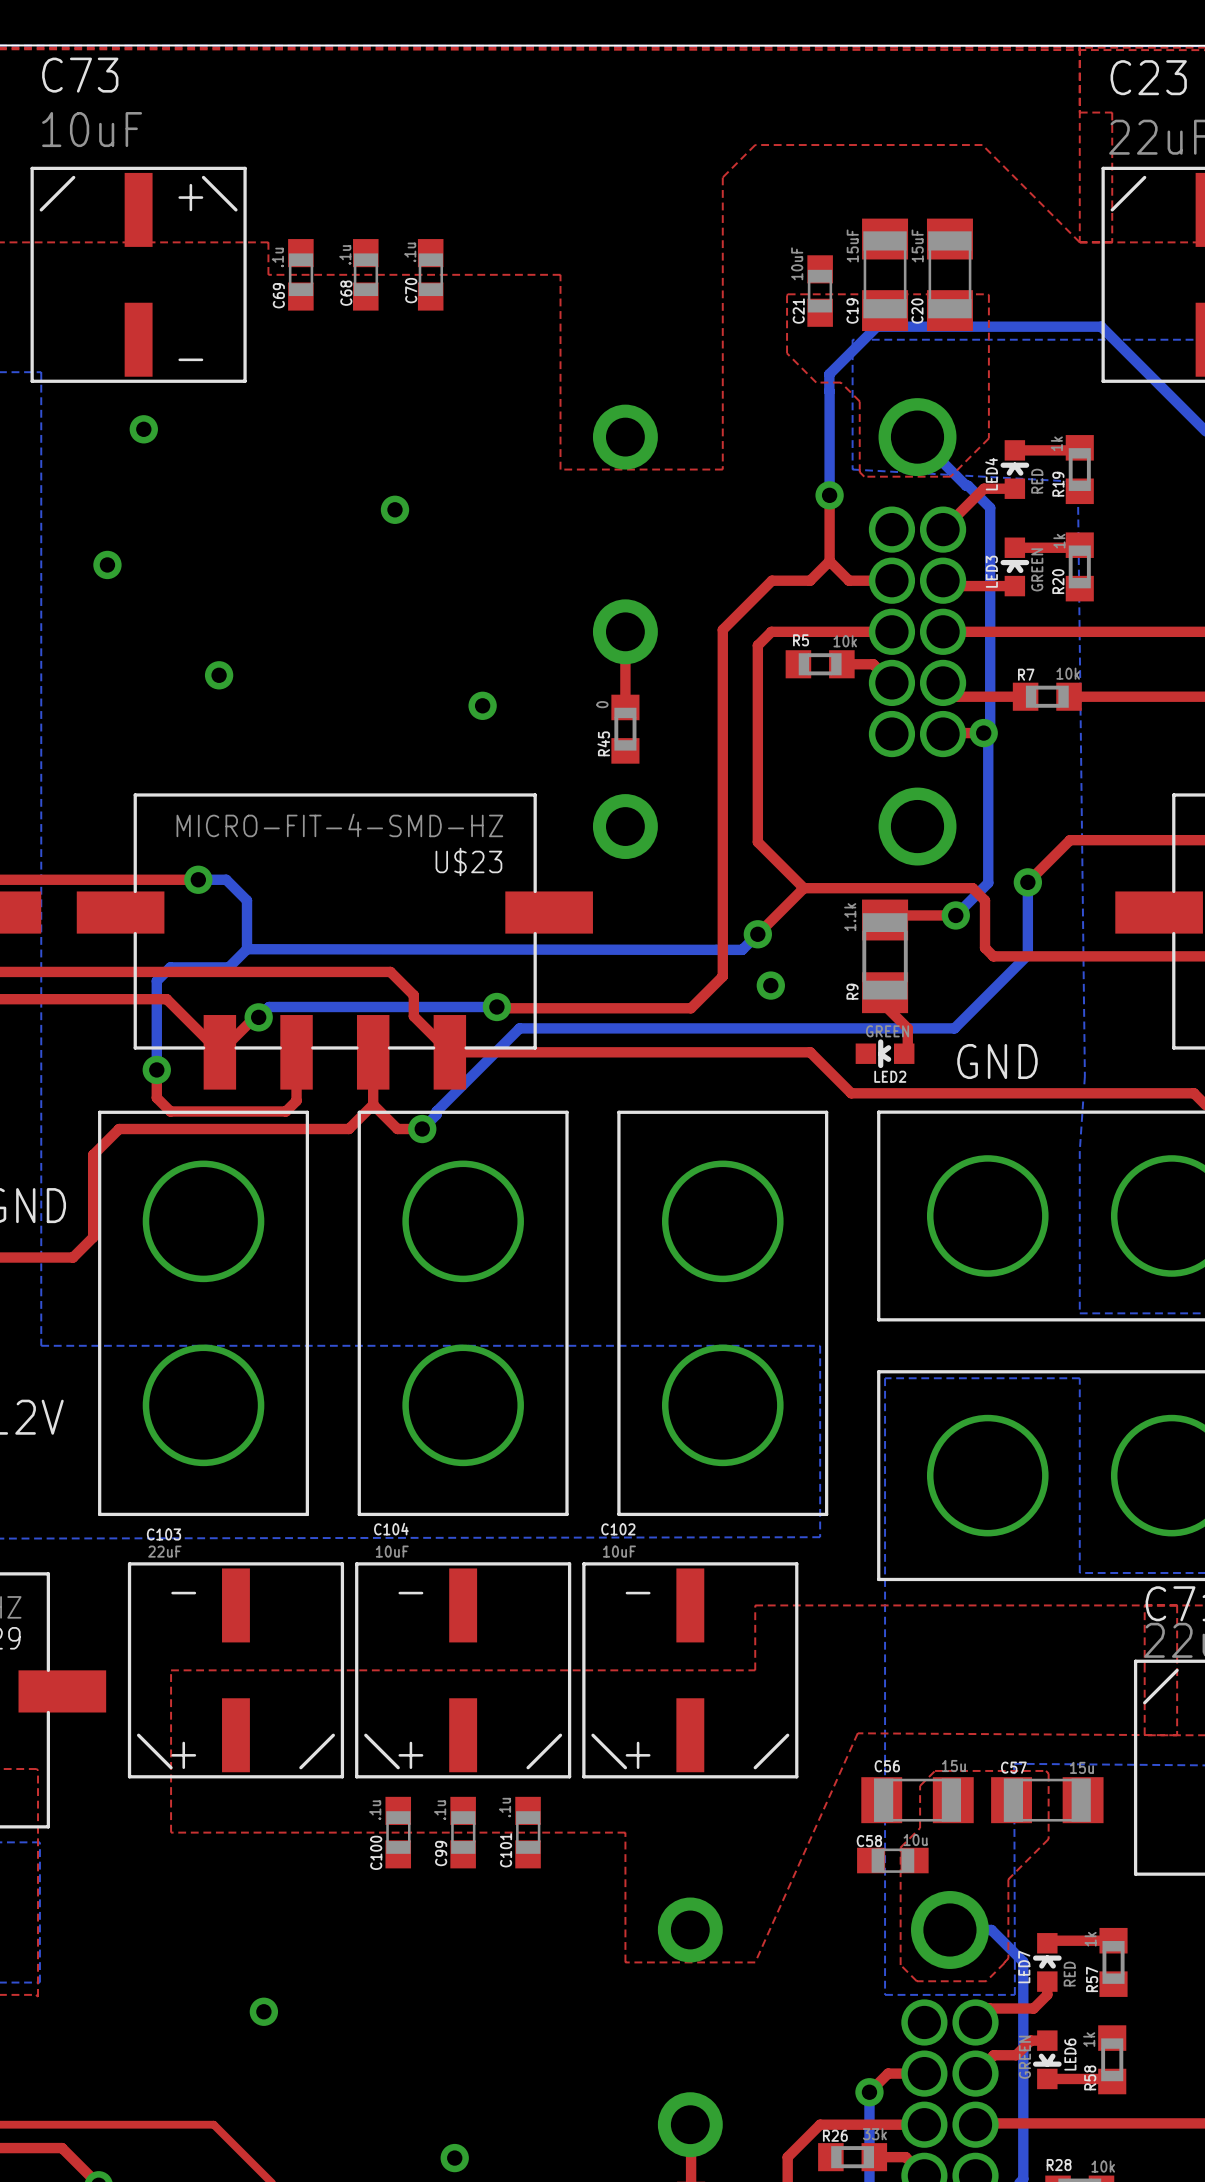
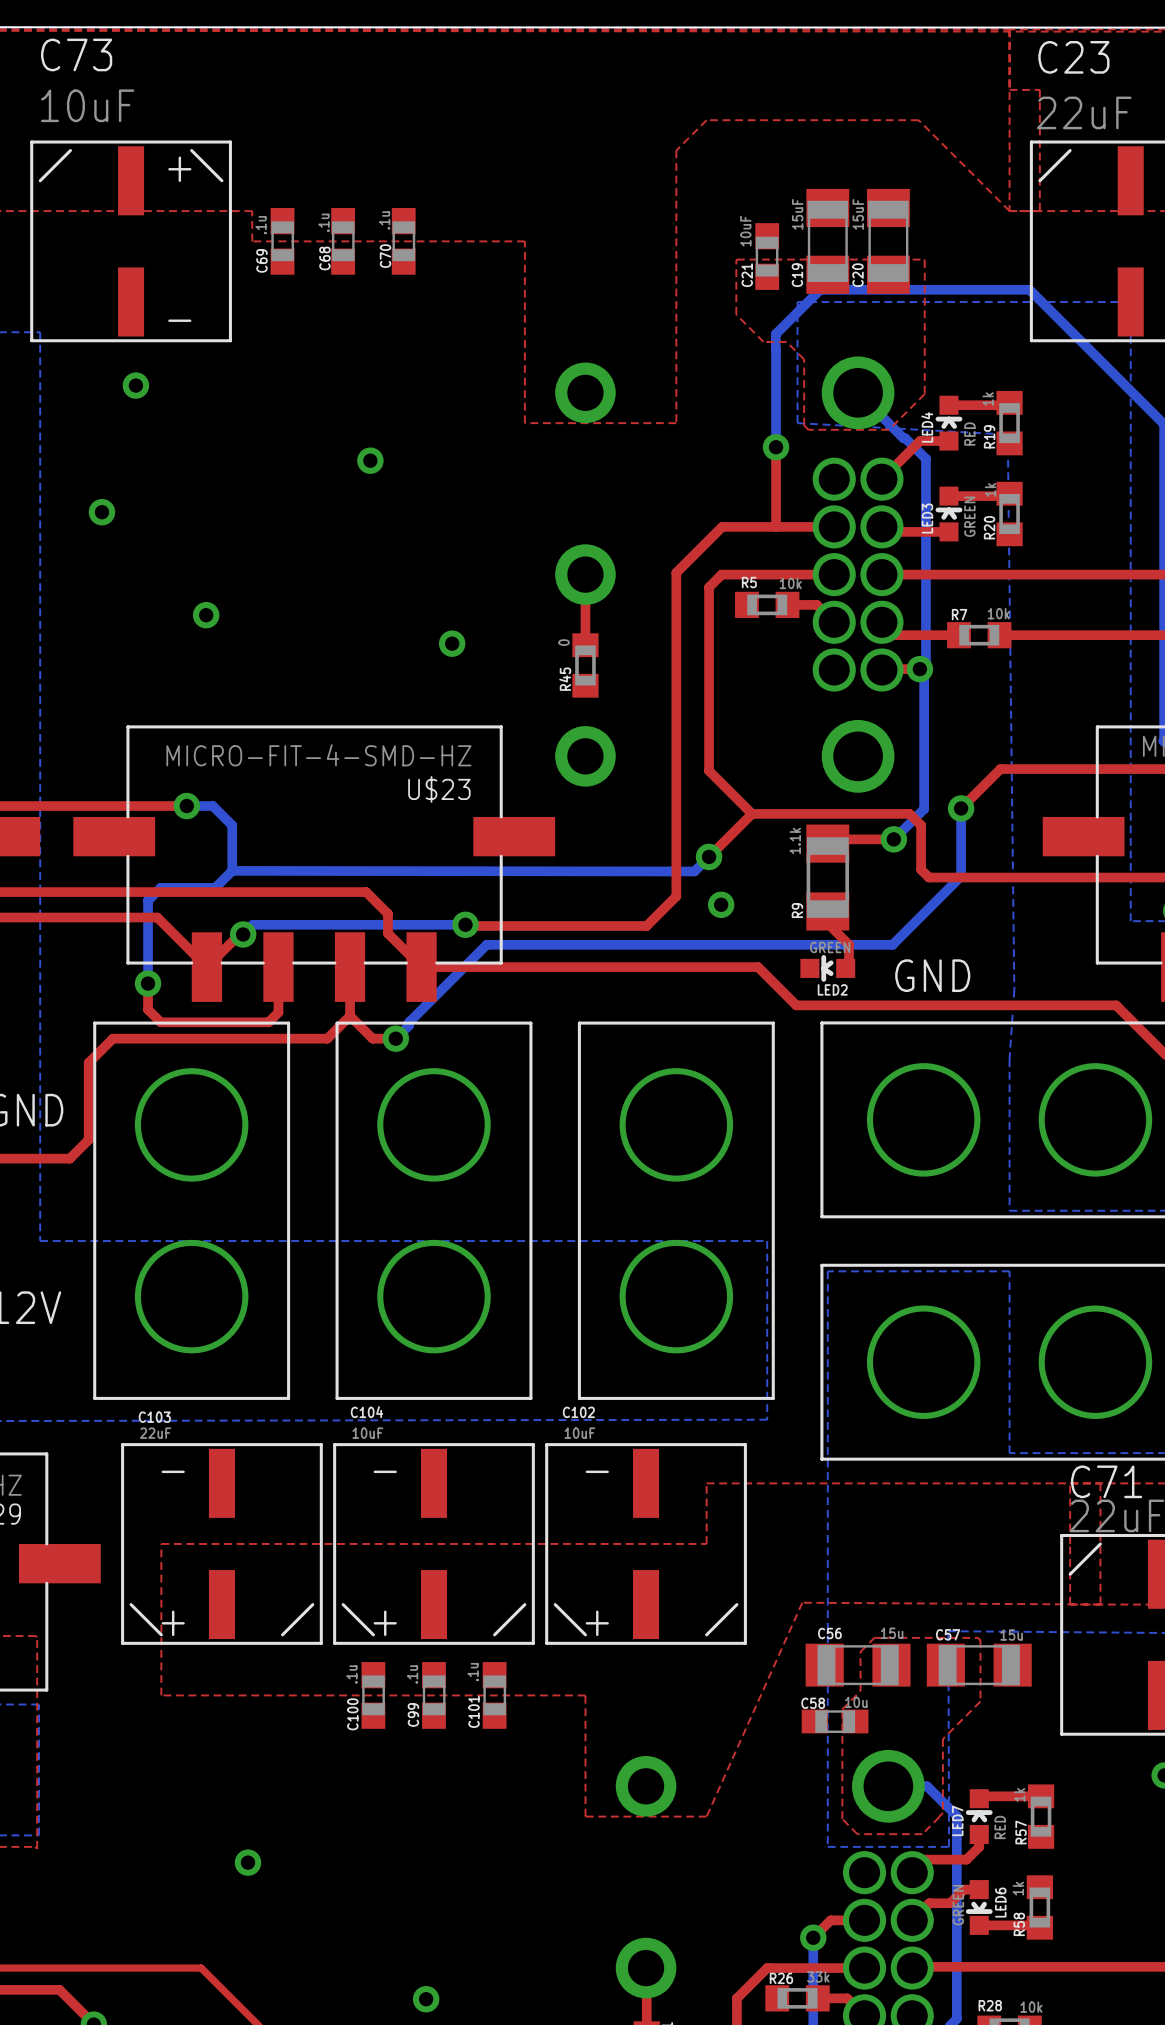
top track: none -> (776, 508) (776, 526)
top track: (810, 580) (829, 561) (849, 580) -> (757, 526) (794, 526)

